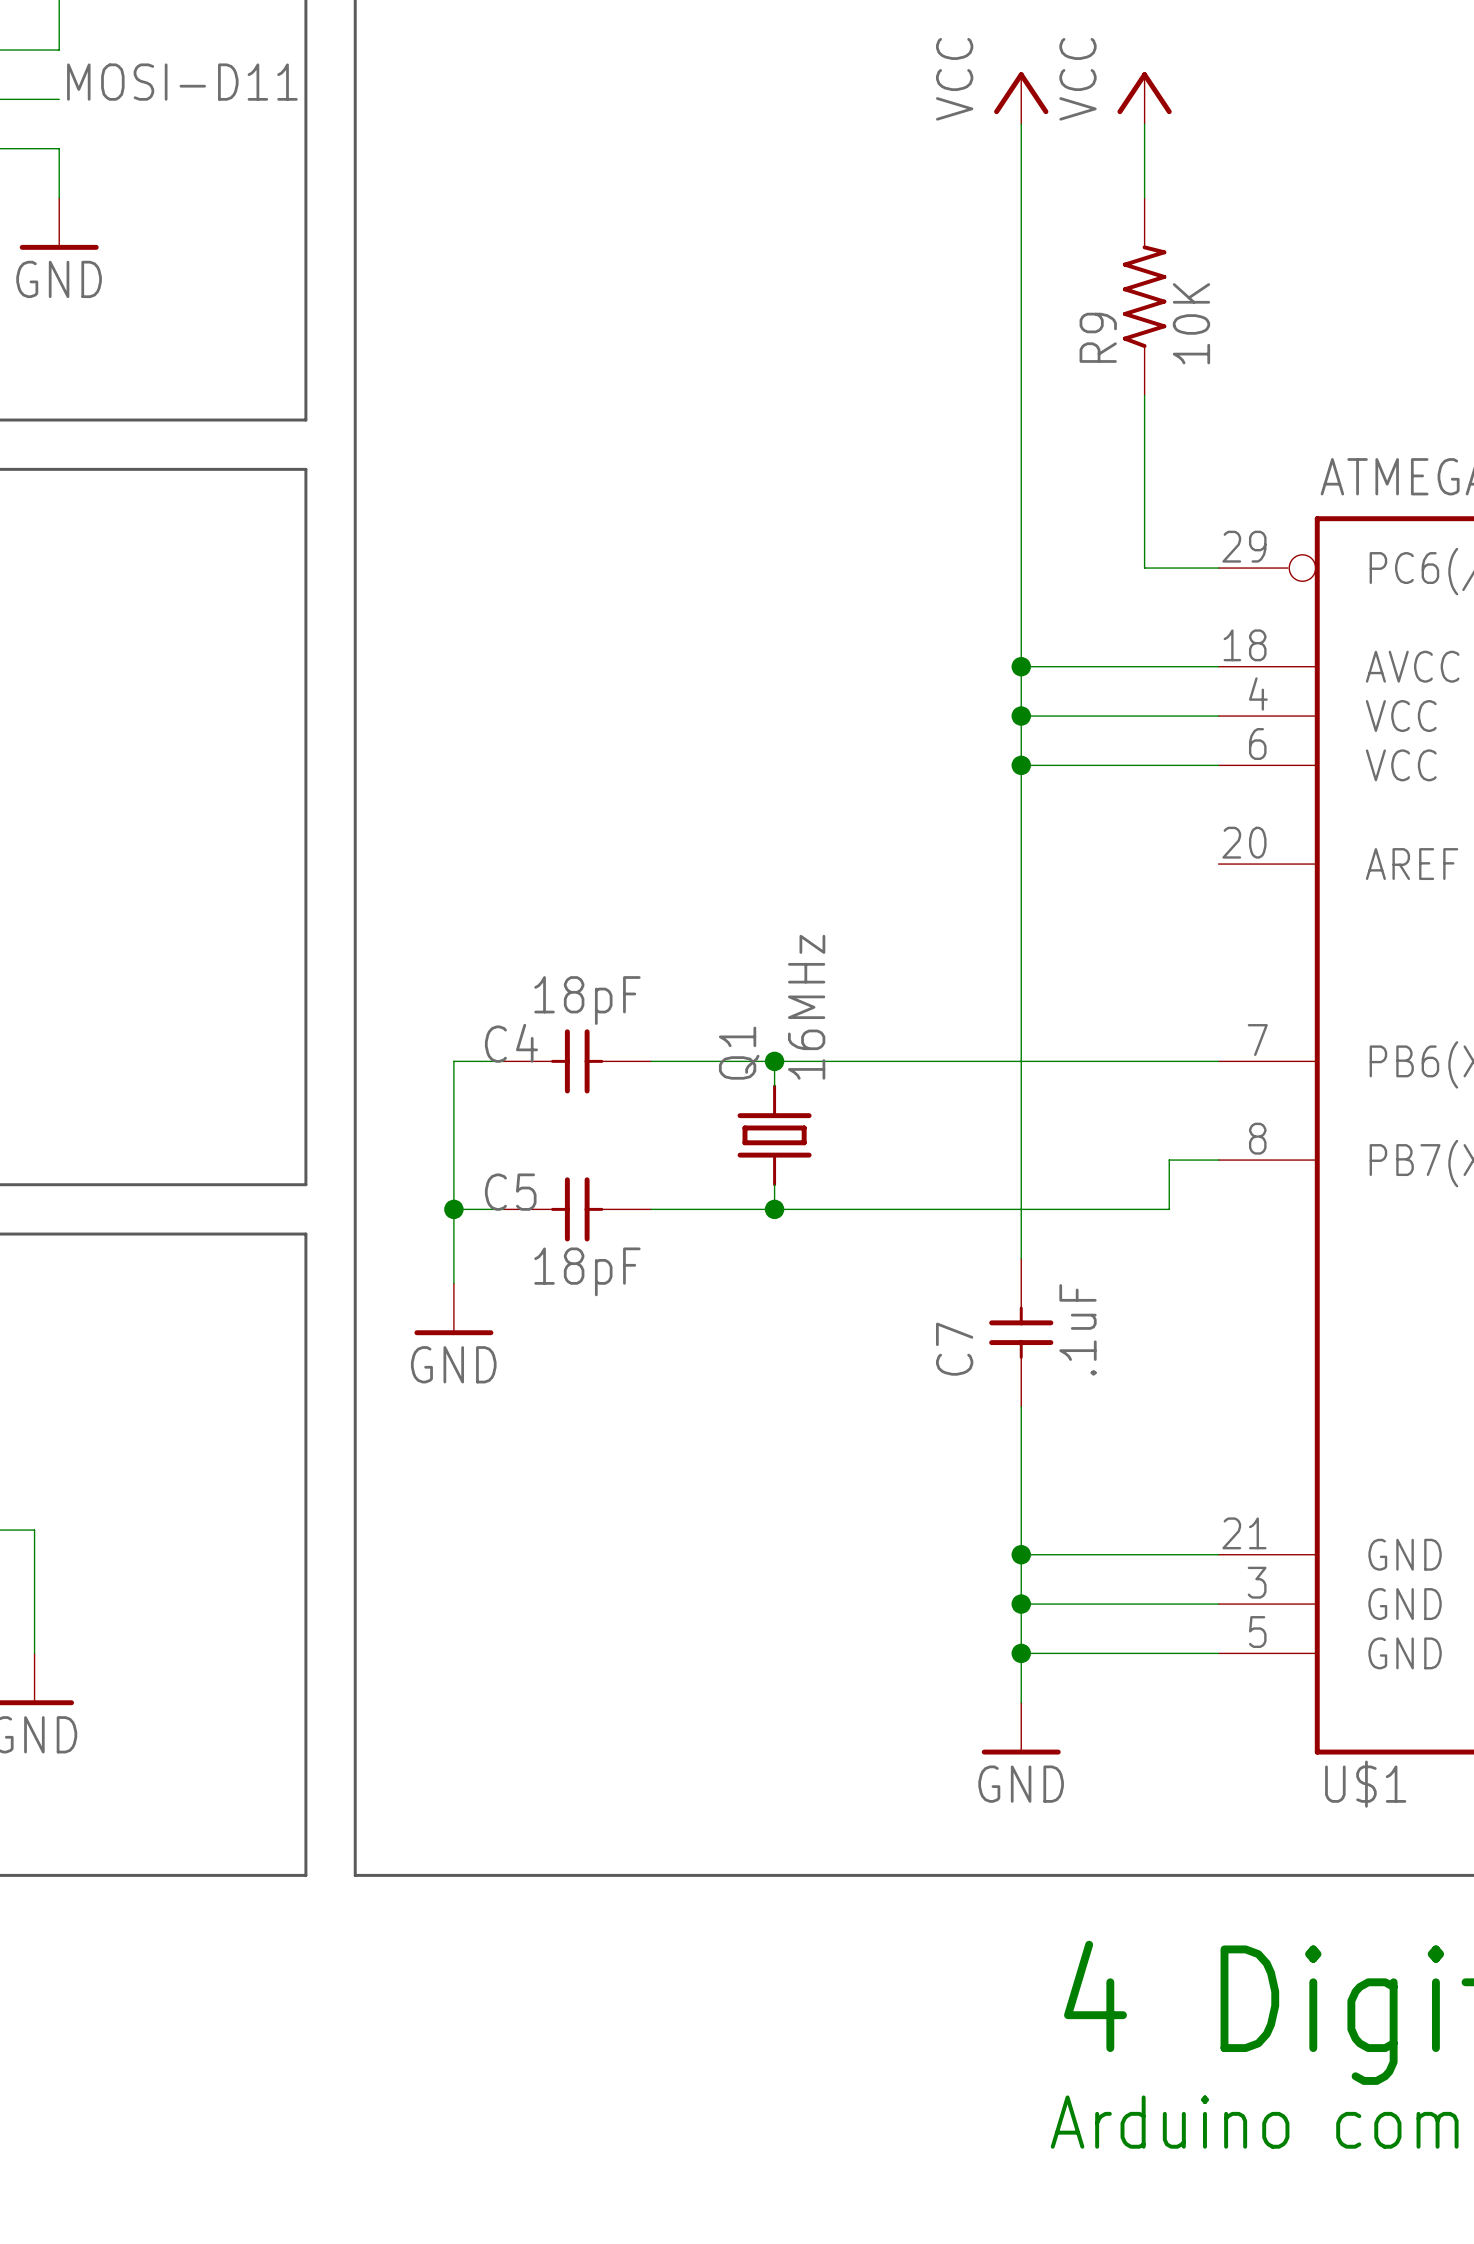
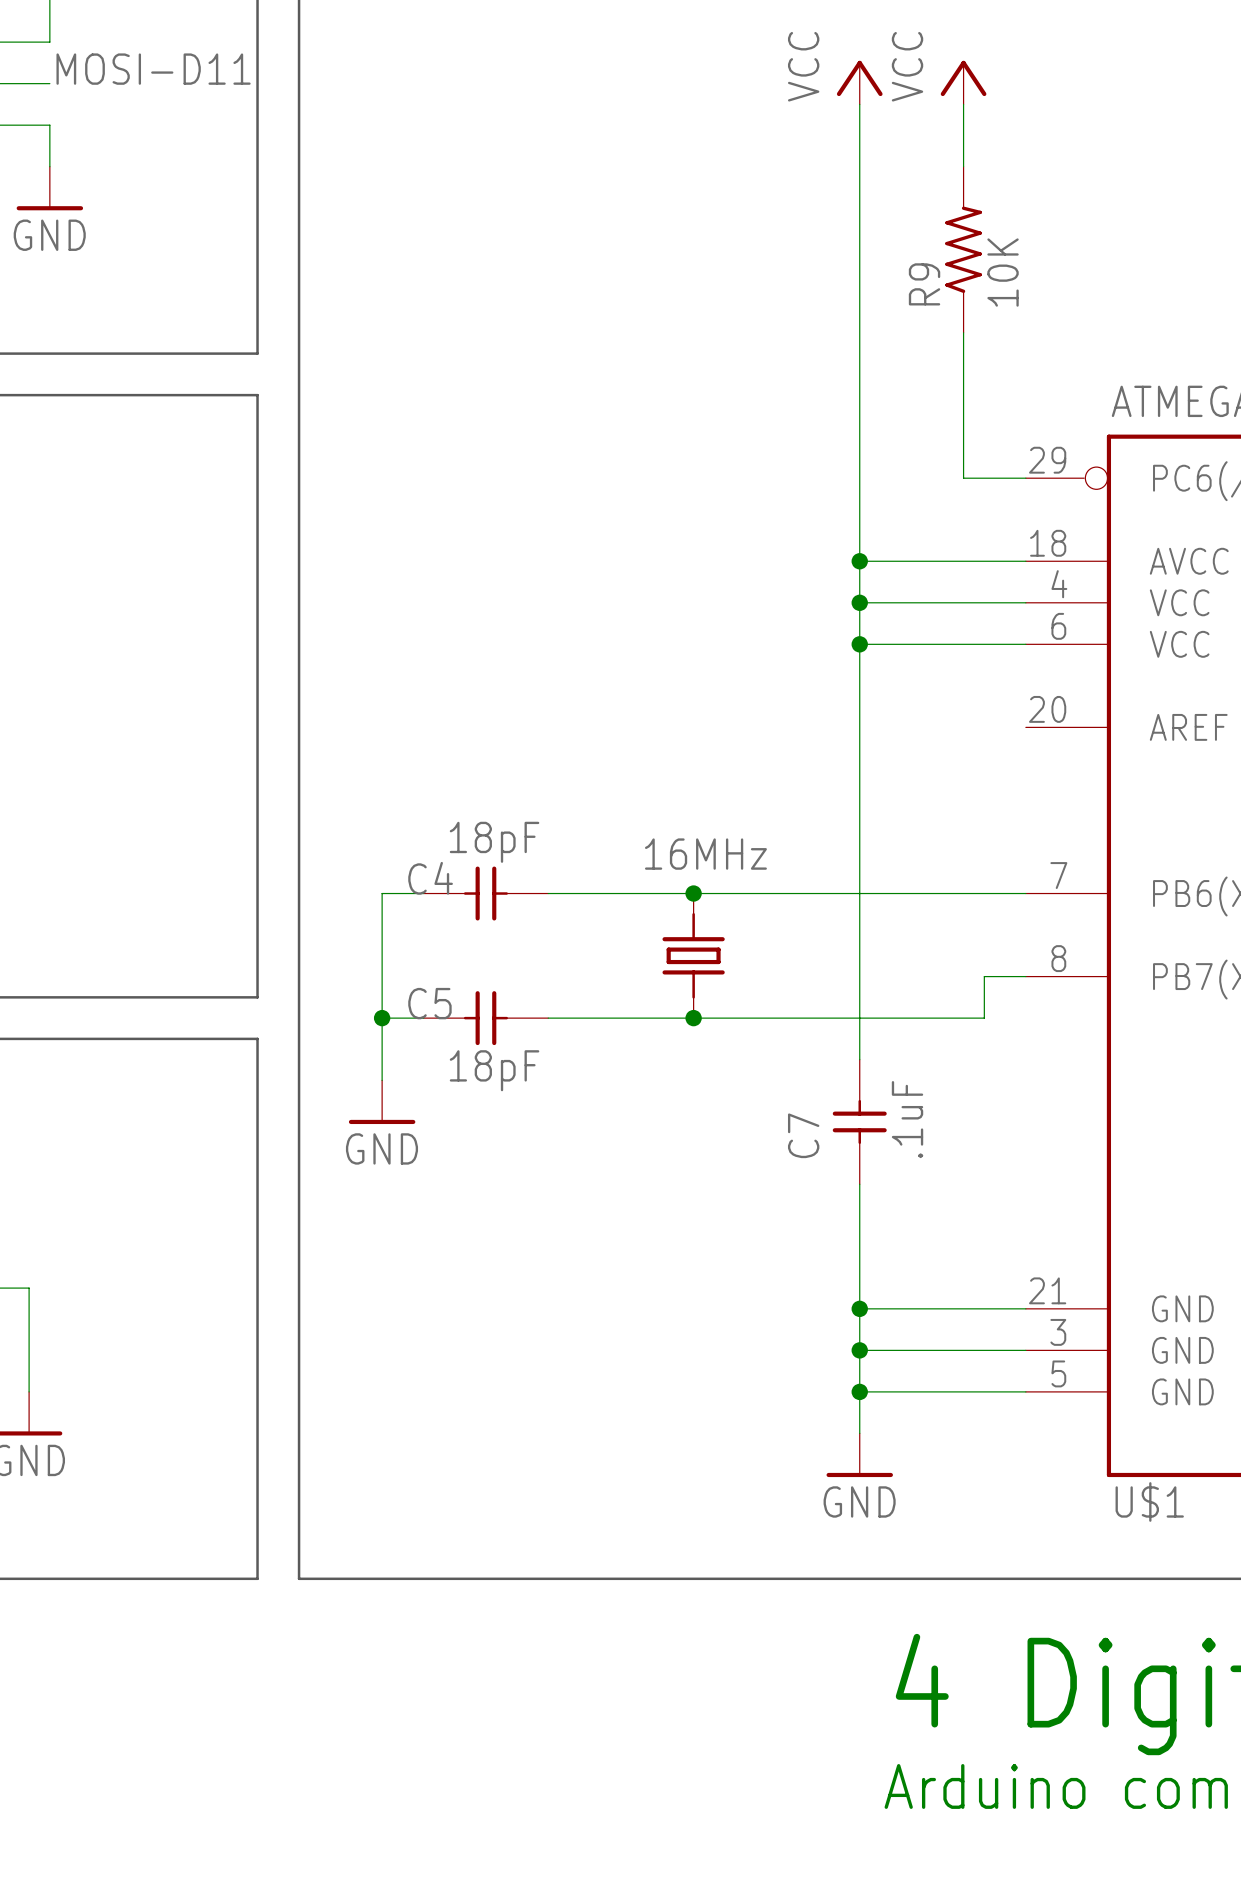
wire: (774, 1061) (774, 1086) -> none
junction position: (774, 1061) -> (693, 893)
Q1: 16MHz (774, 1135) -> none
part: none -> 16MHz (693, 955)
wire: (774, 1184) (774, 1209) -> none
junction position: (774, 1209) -> (693, 1018)

